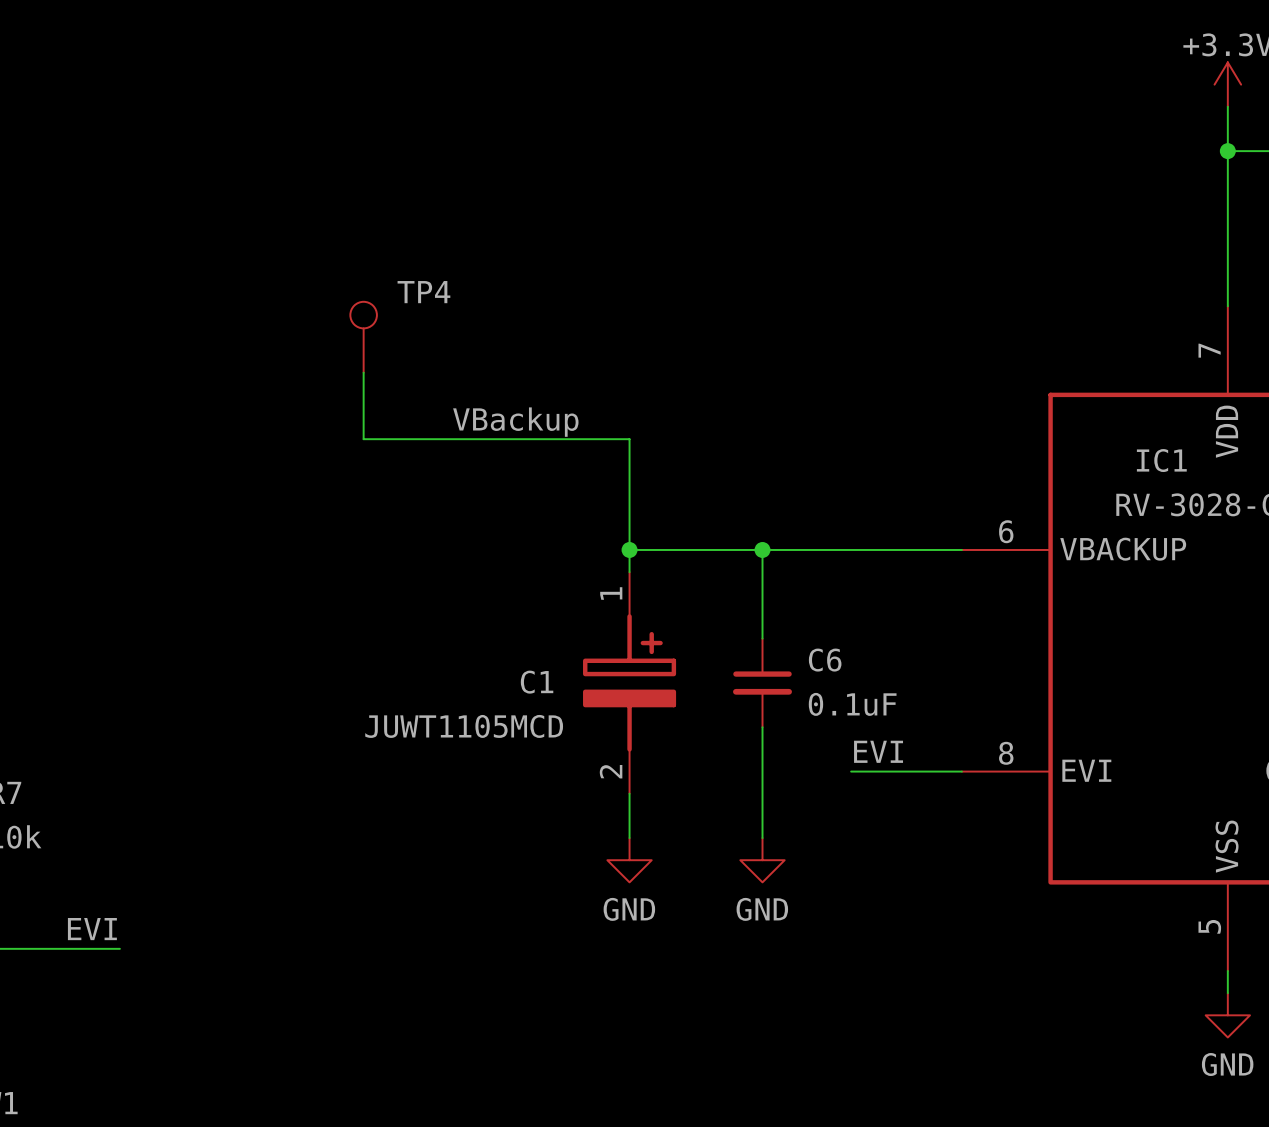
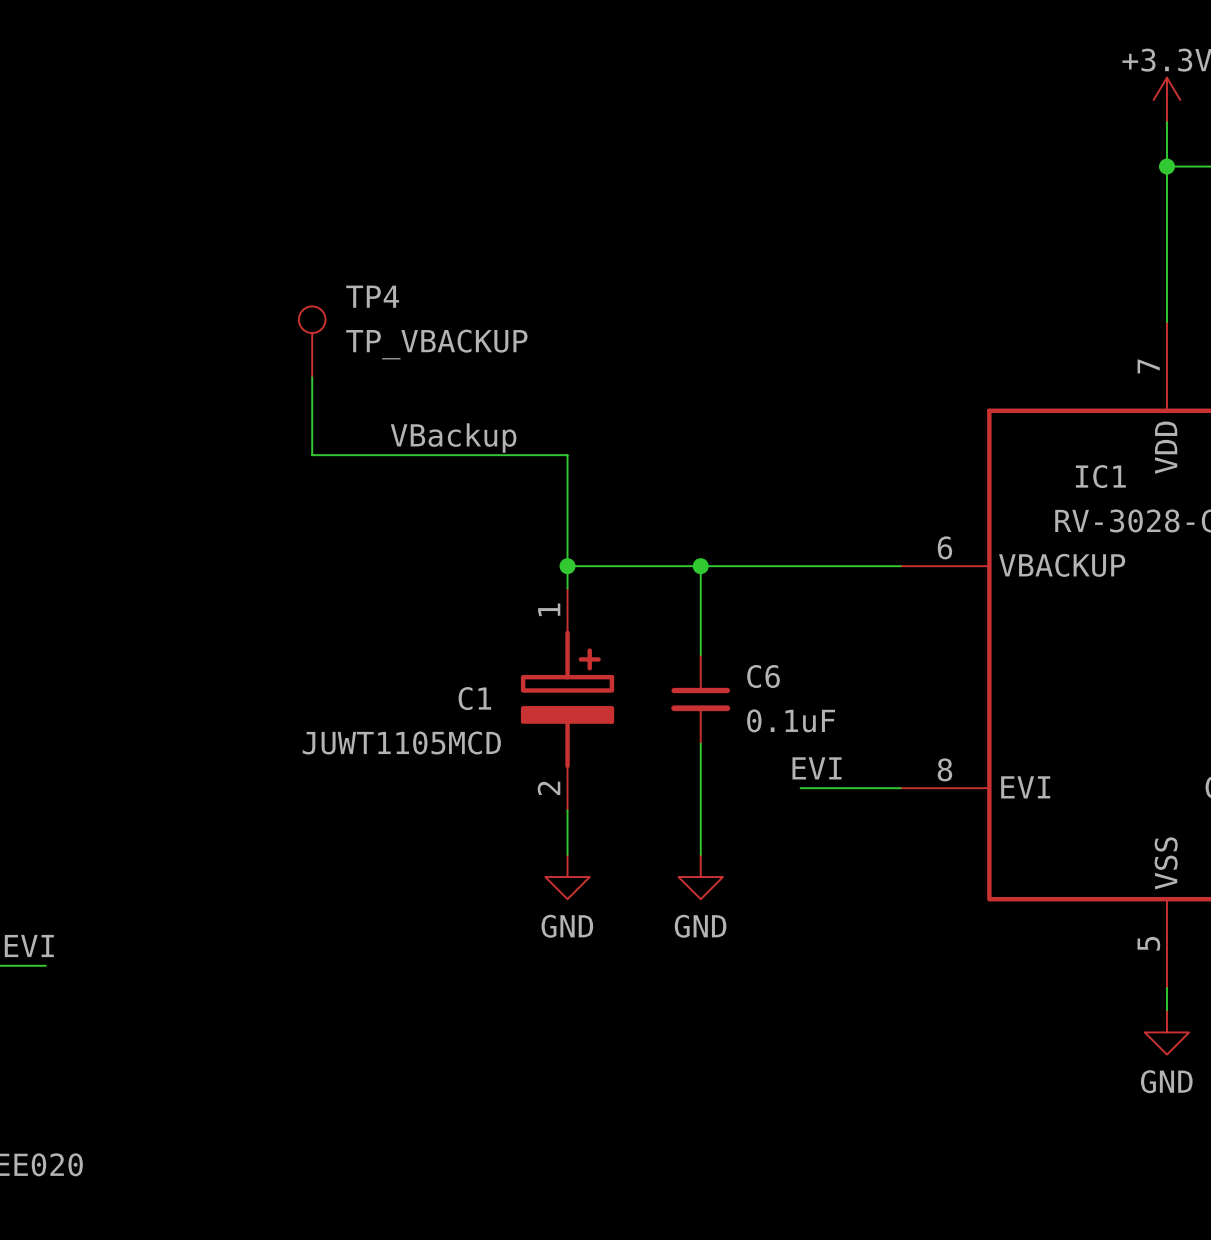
TP4 value: none -> TP_VBACKUP (436, 344)
TP4 position: (363, 337) -> (312, 341)
wire: (363, 372) (363, 439) (374, 439) -> (312, 377) (312, 455)
wire: (851, 771) (862, 771) -> none
wire: (108, 948) (119, 948) -> none

